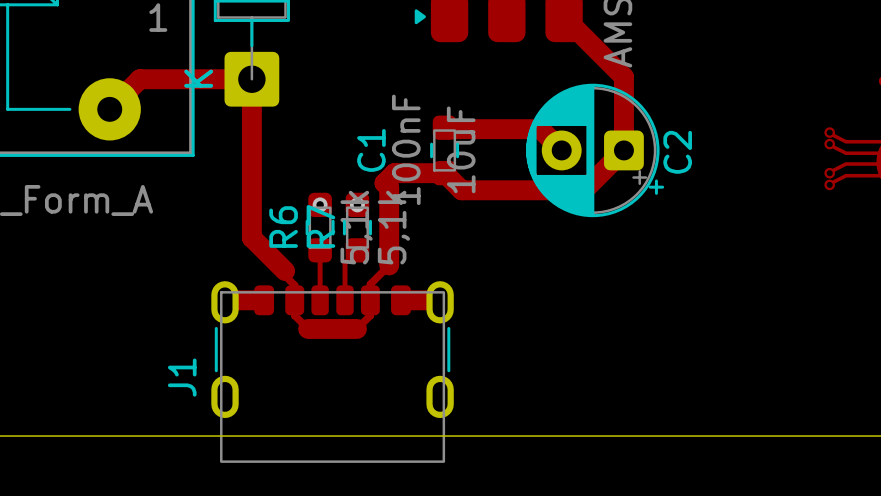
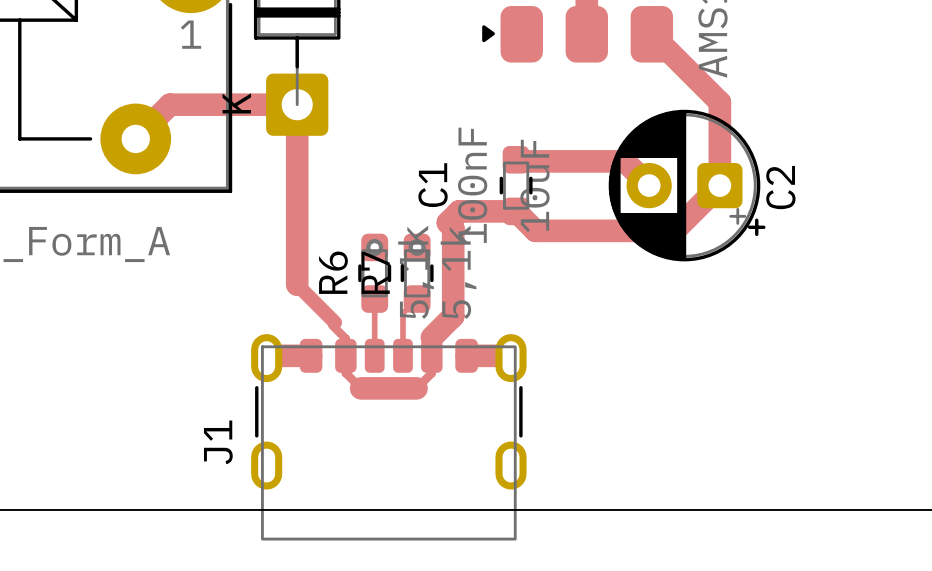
top track width: thick (251, 237) (285, 271) -> thin (297, 284) (334, 322)
top track width: thin (389, 265) (370, 284) -> thick (453, 316) (431, 337)

